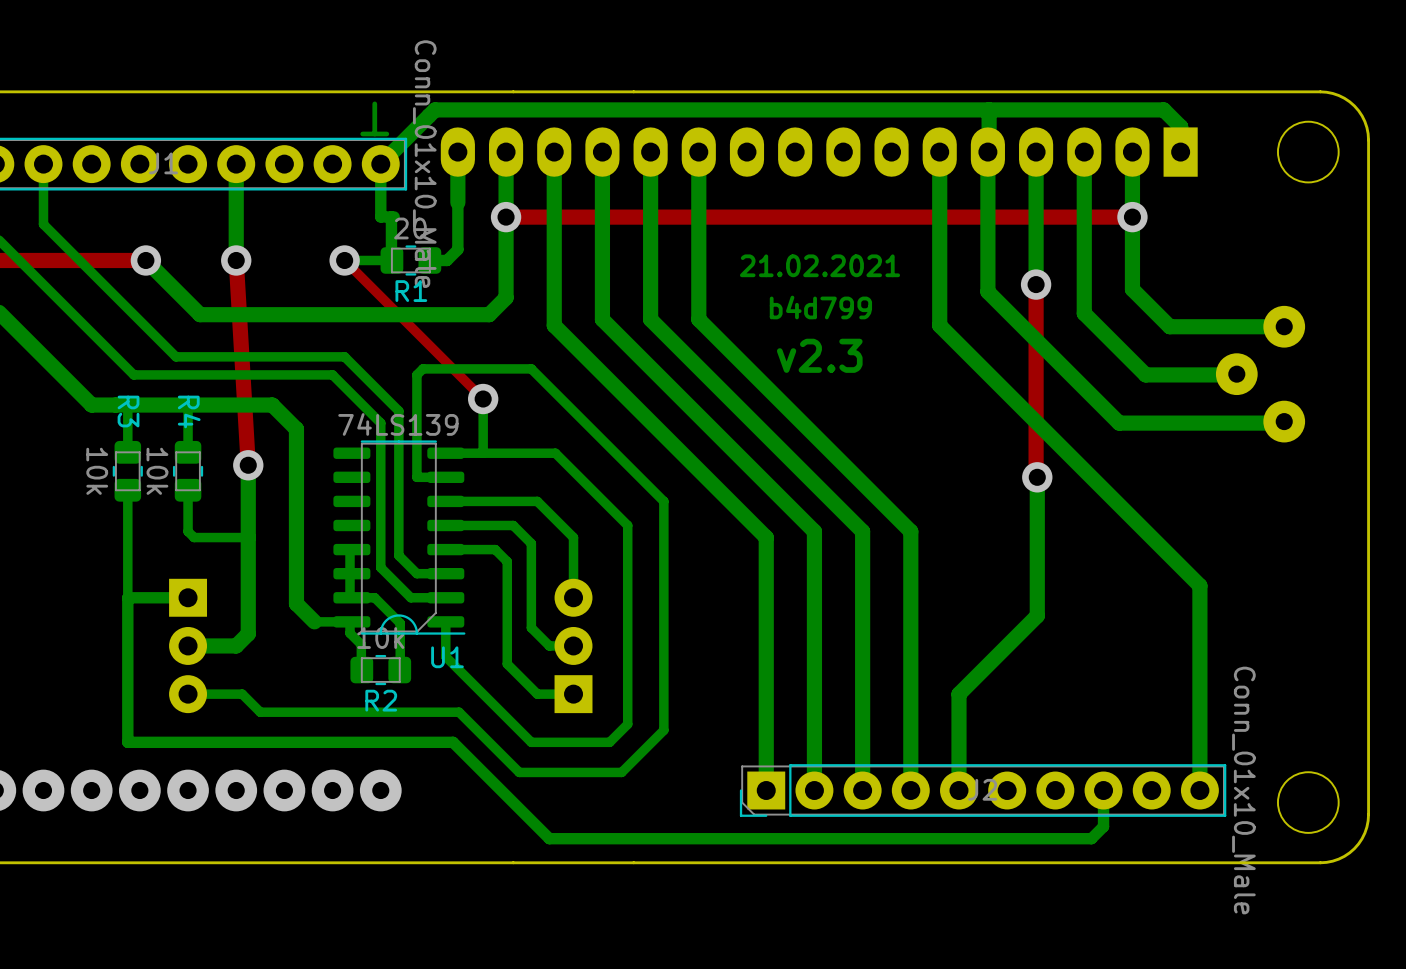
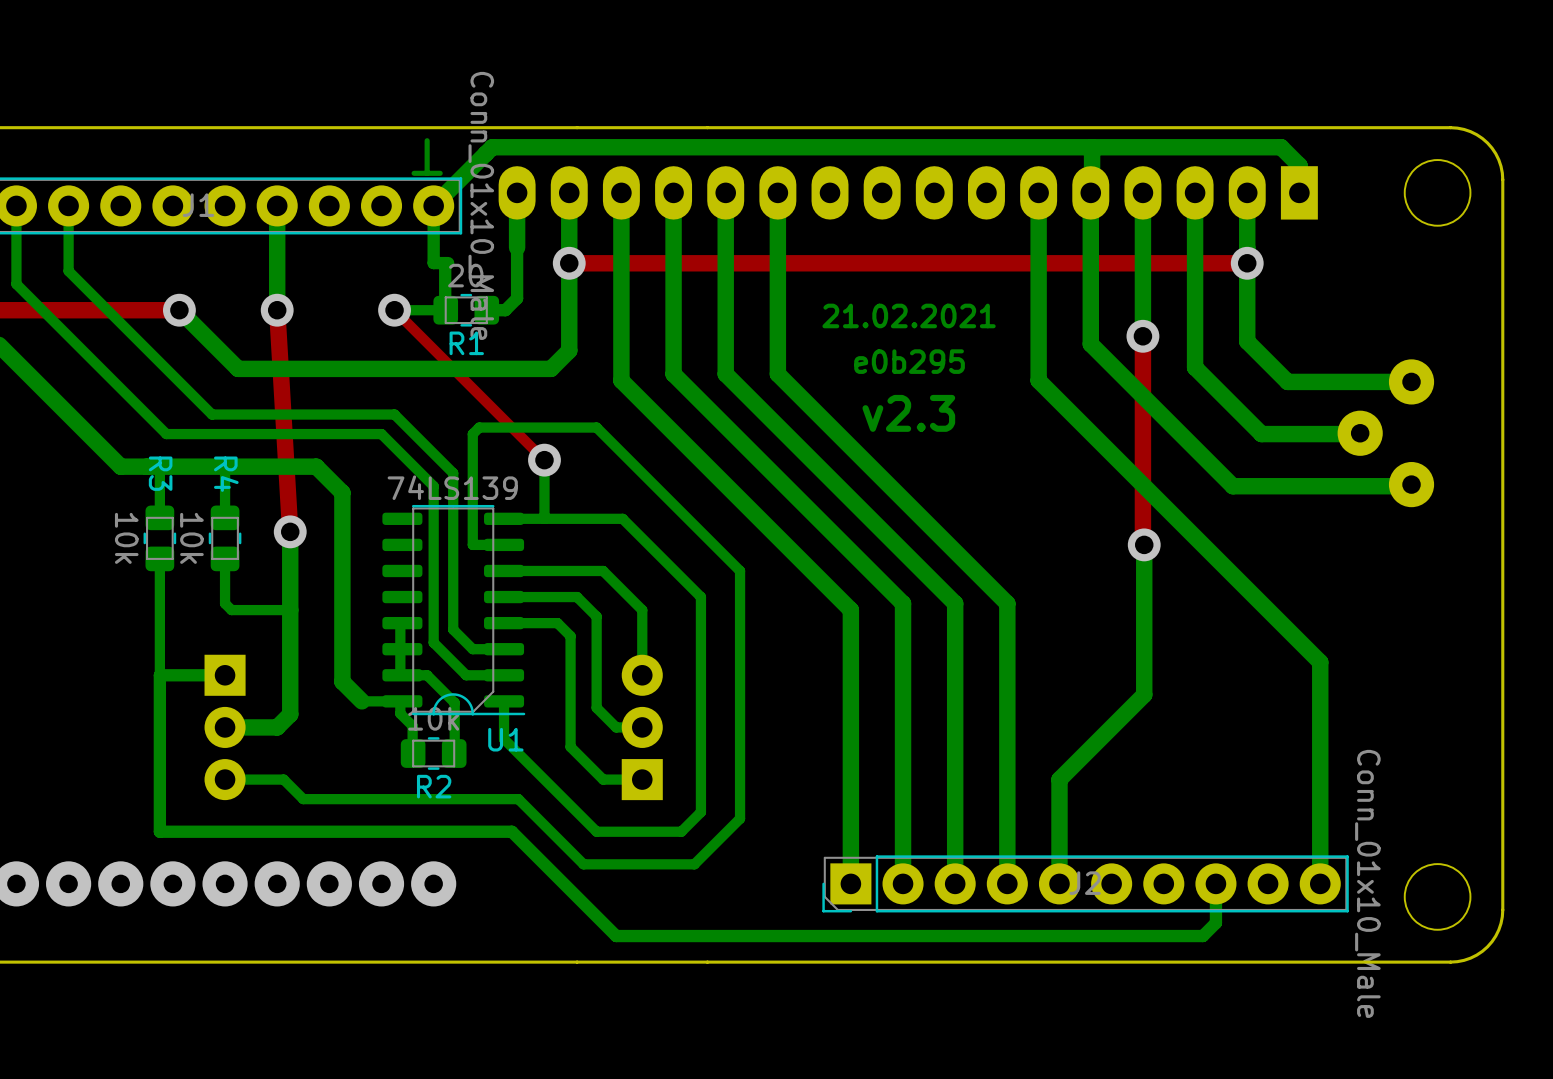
text: b4d799 (820, 307) -> e0b295 (909, 361)

